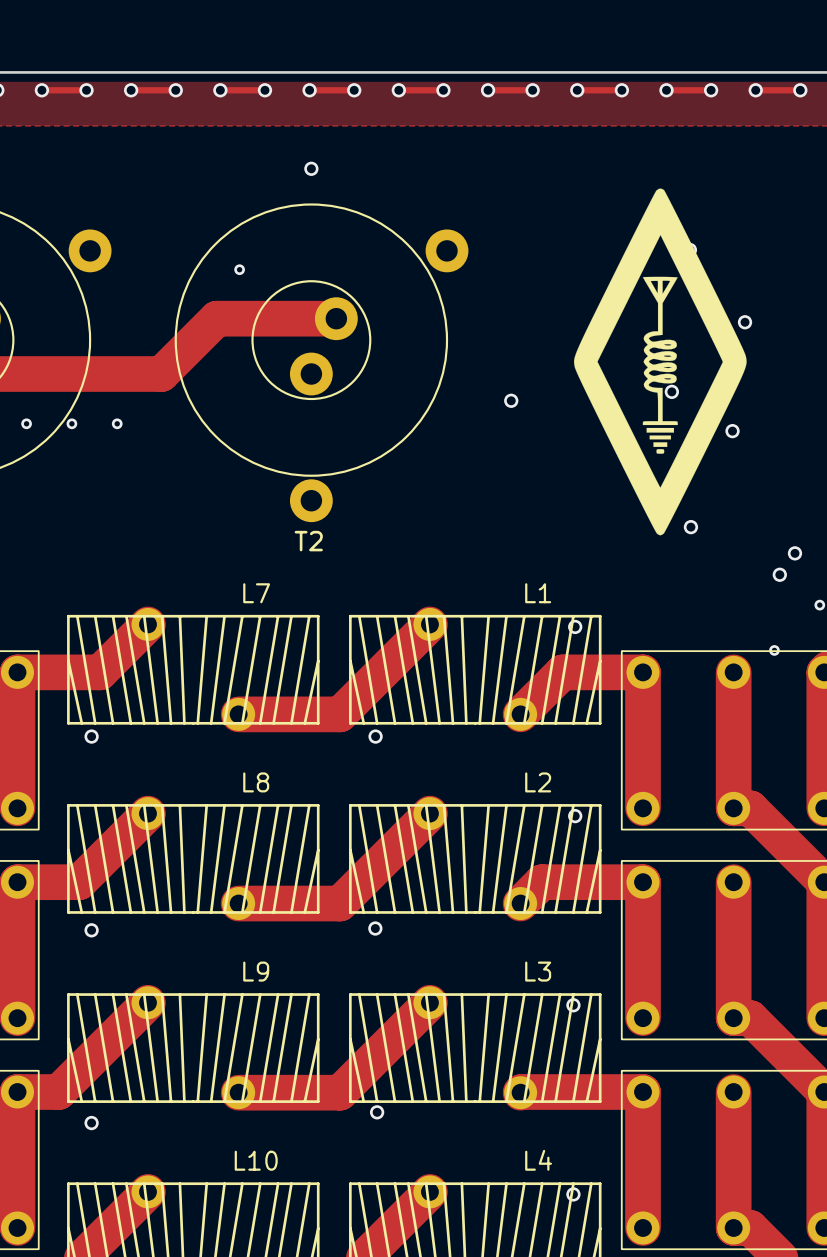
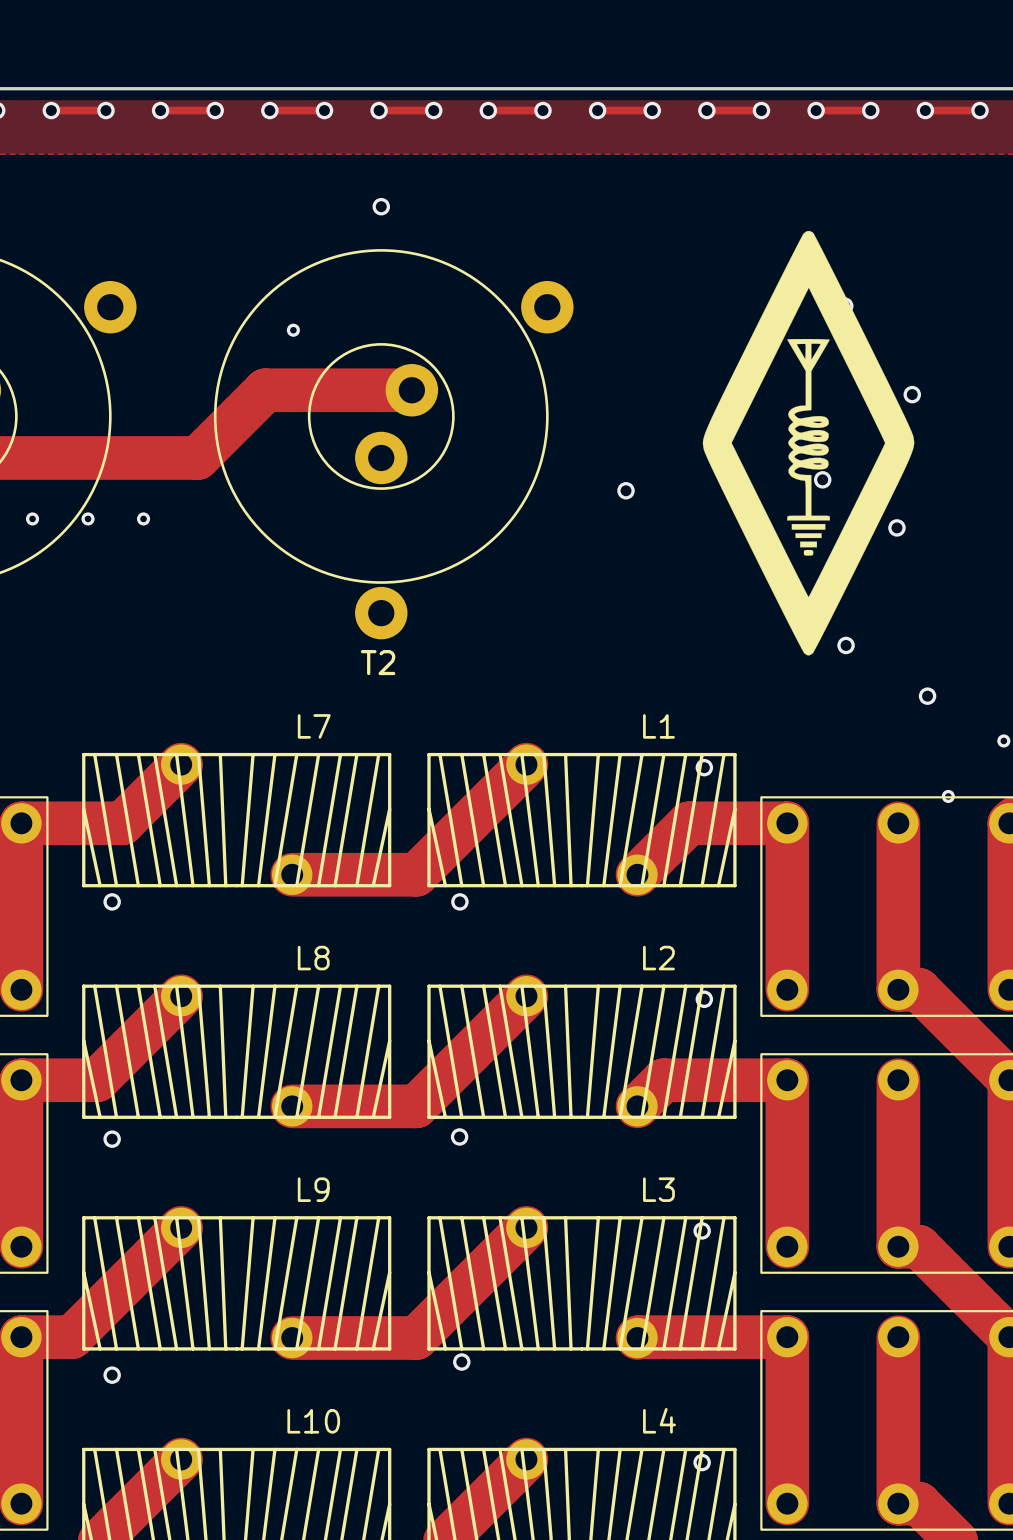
via: (794, 553) -> none
via: none -> (927, 696)
via: (779, 574) -> none

